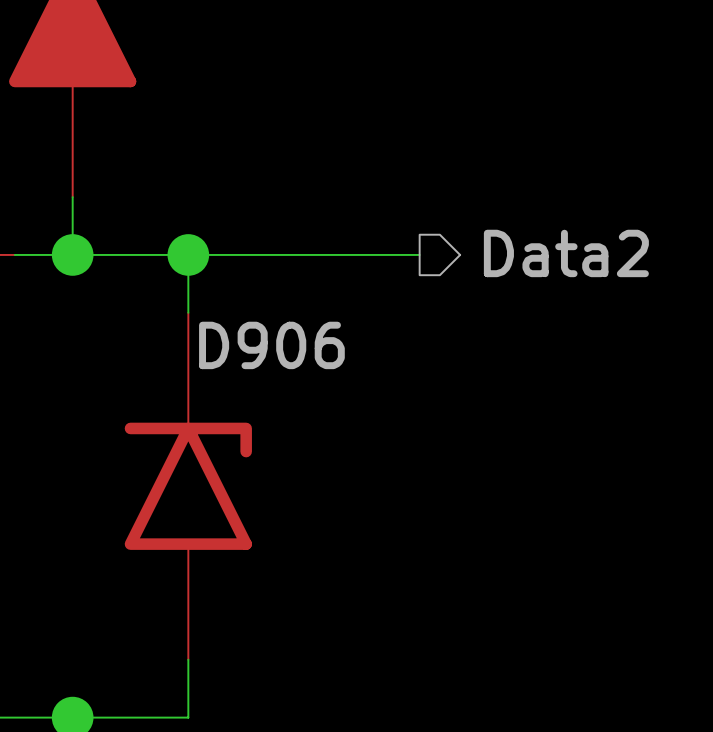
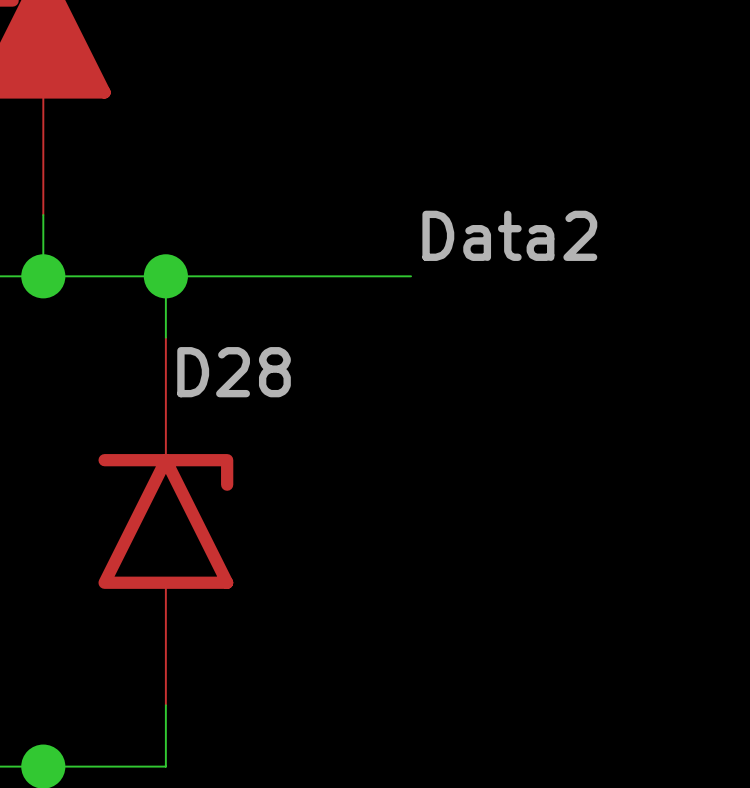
label: none -> Data2 (509, 235)
hierarchical label: Data2 (566, 253) -> none
D906 name: D906 (271, 345) -> D28 (234, 372)

